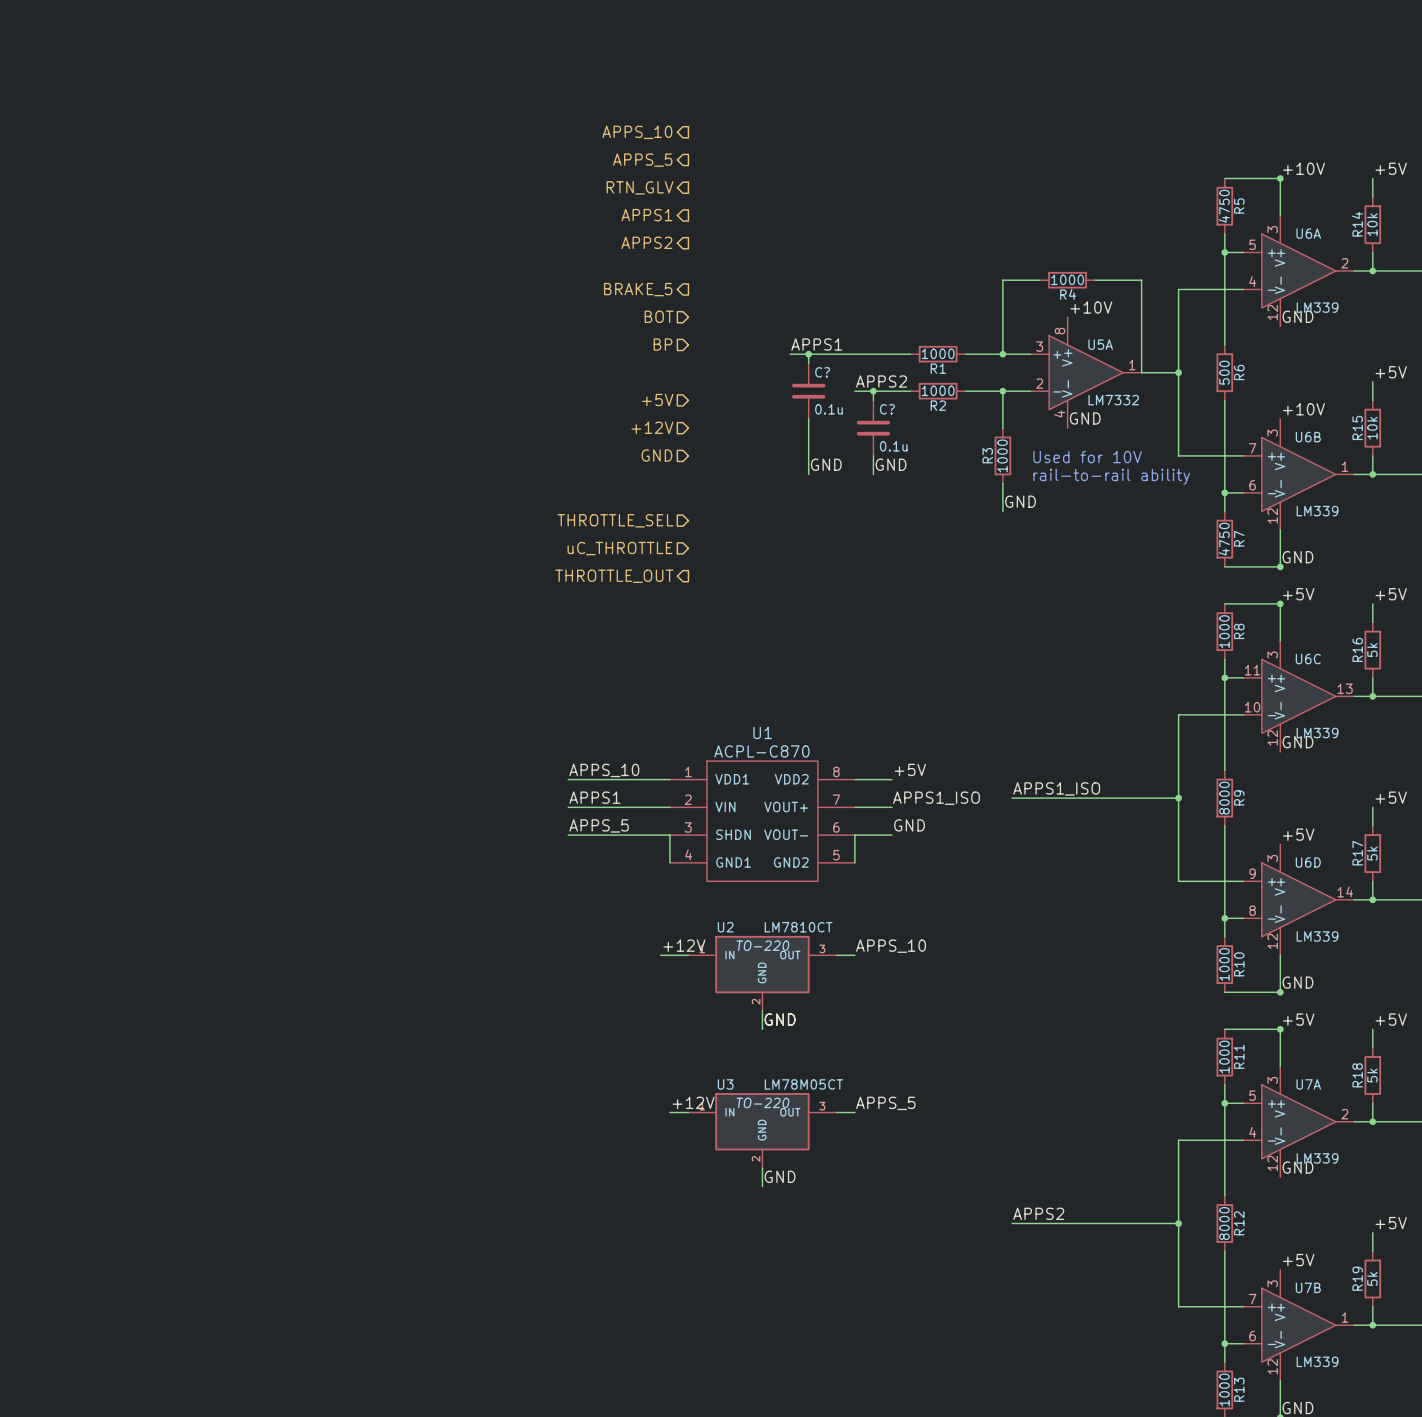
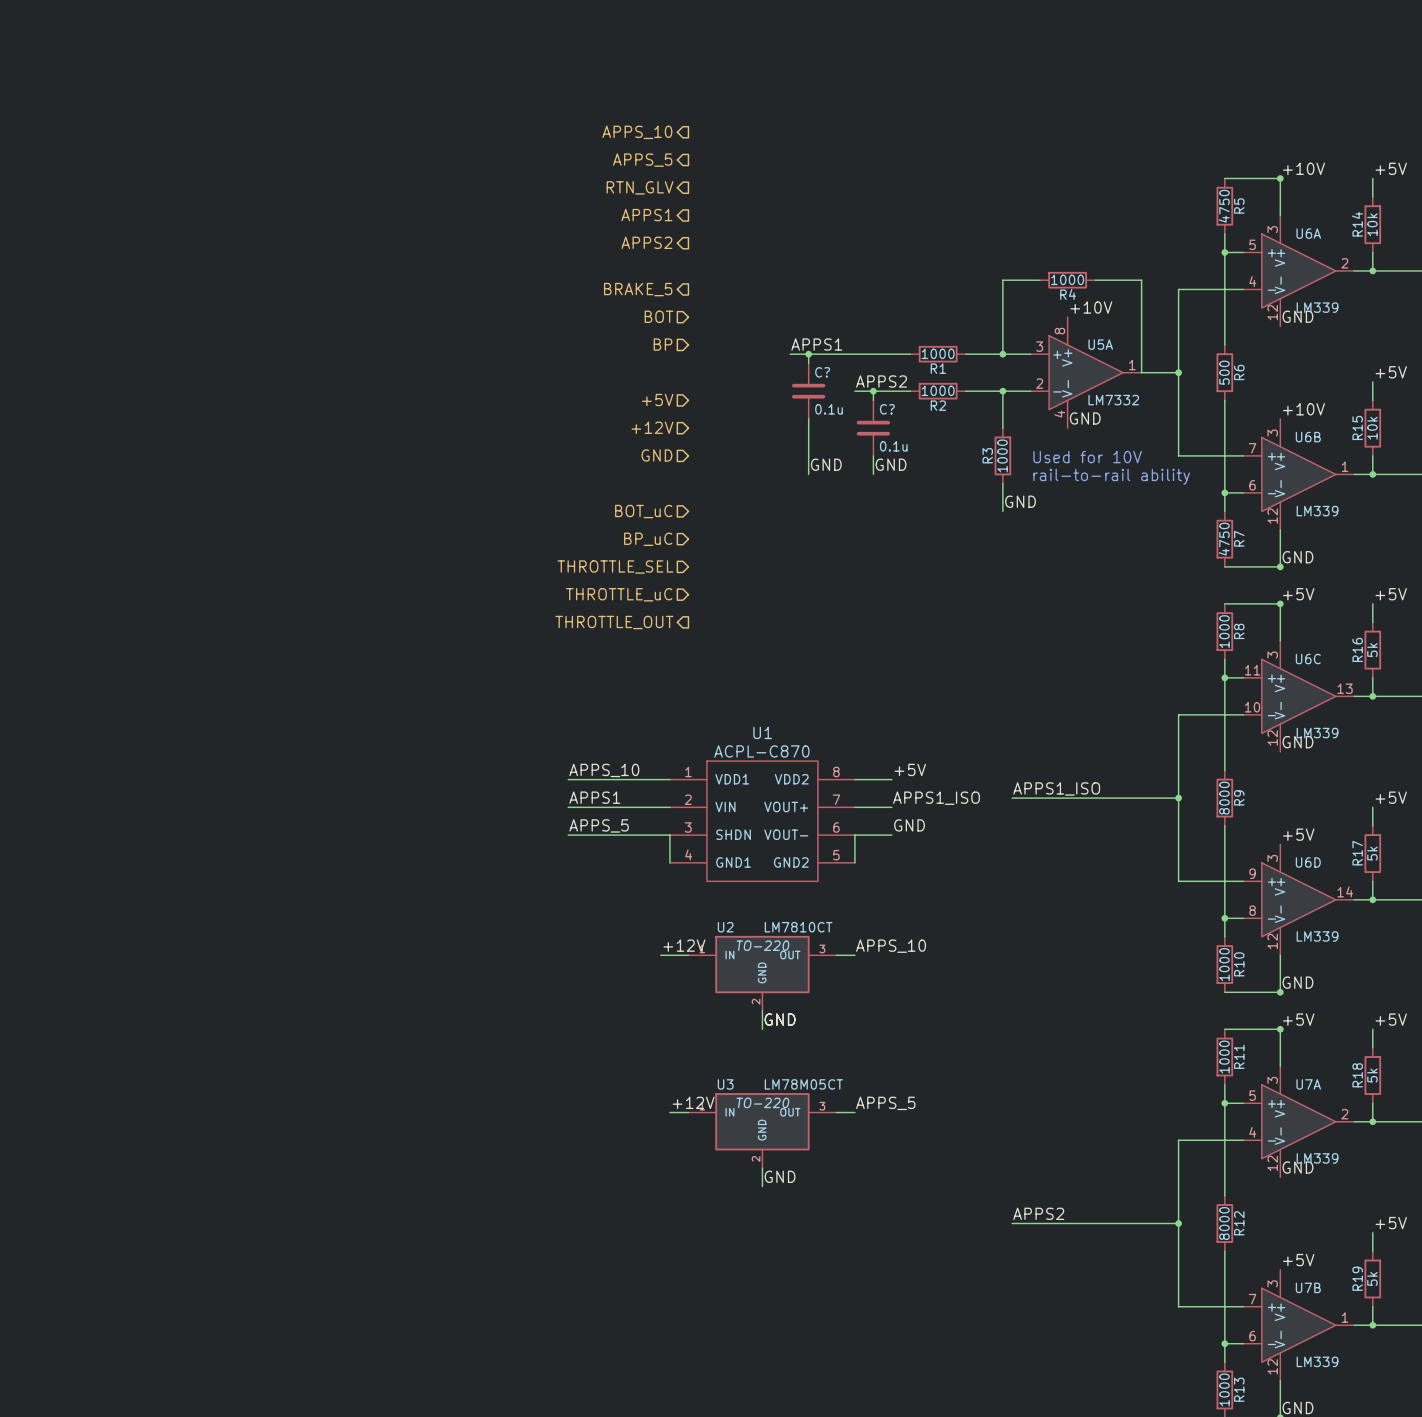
hierarchical label: none -> BOT_uC (643, 511)
hierarchical label position: THROTTLE_SEL (615, 520) -> THROTTLE_SEL (615, 567)
hierarchical label: none -> BP_uC (648, 539)
hierarchical label: uC_THROTTLE (619, 548) -> none
hierarchical label position: THROTTLE_OUT (614, 576) -> THROTTLE_OUT (614, 622)
hierarchical label: none -> THROTTLE_uC (619, 594)

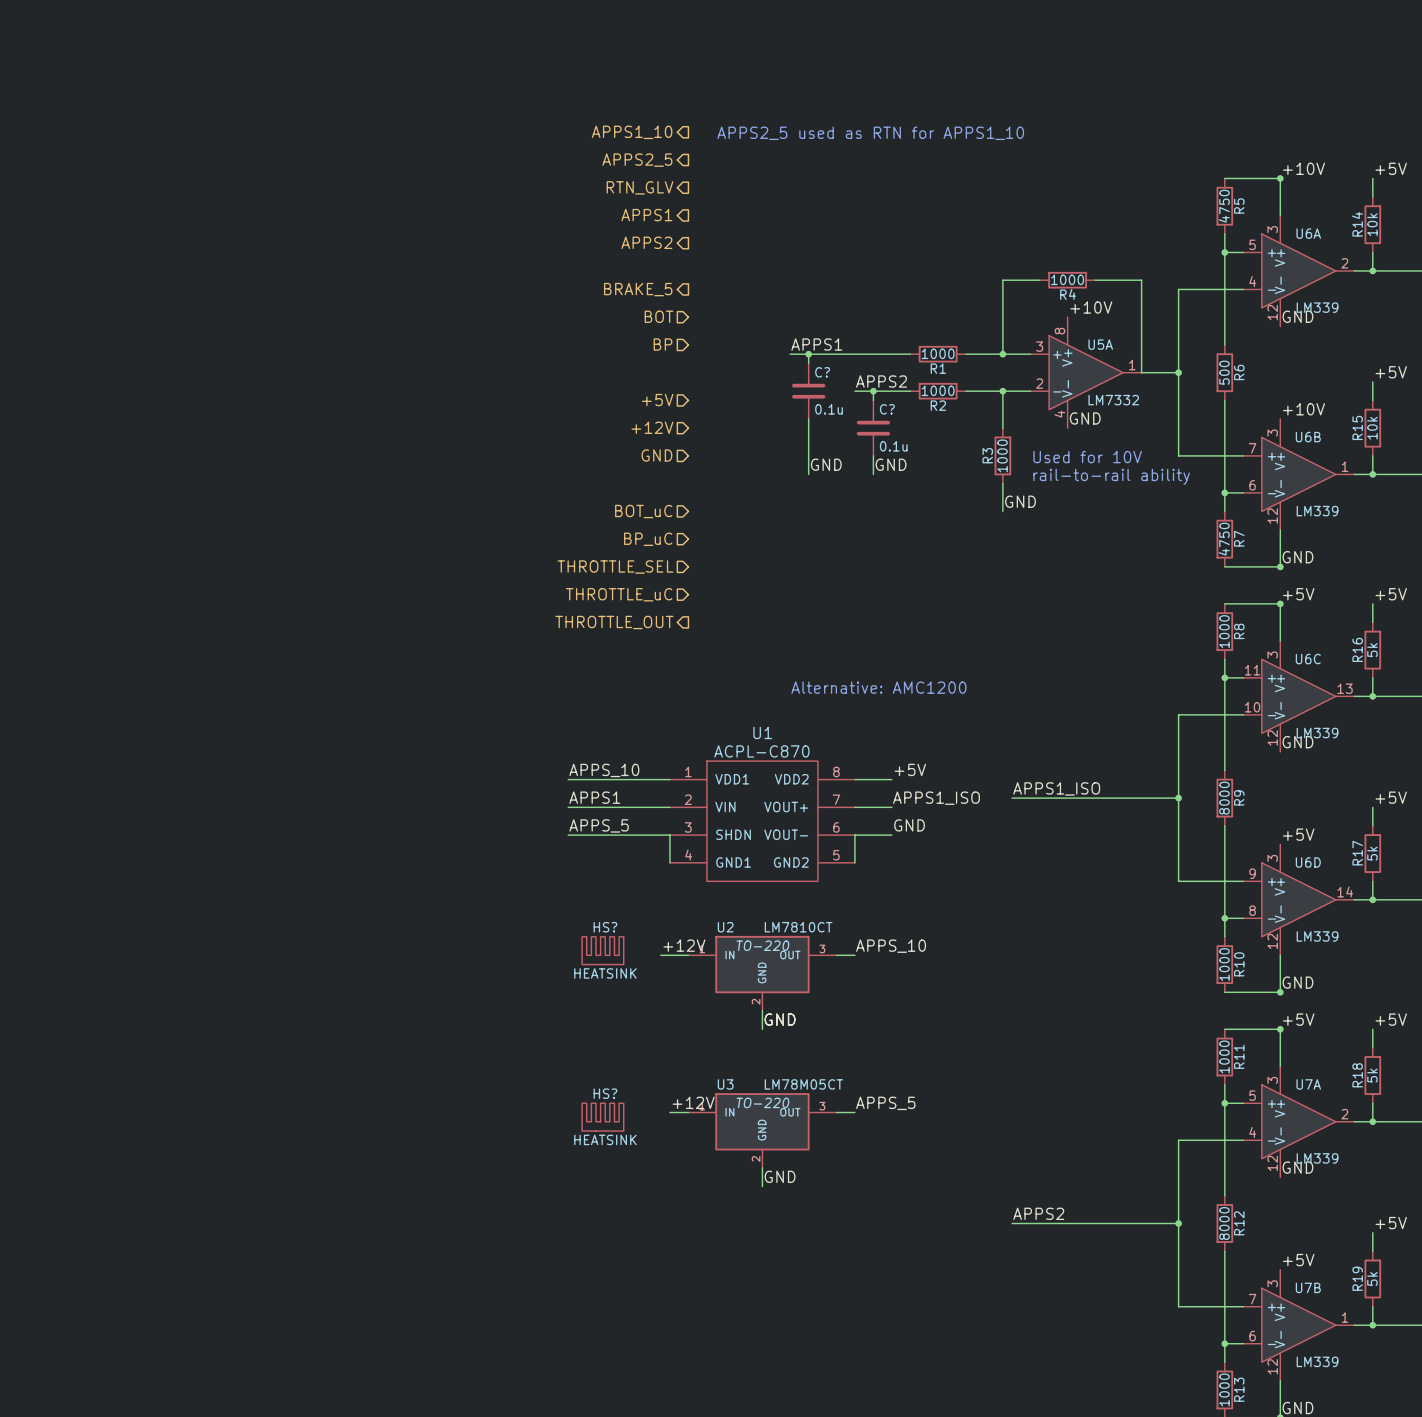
hierarchical label: APPS_10 (637, 132) -> APPS1_10 (632, 132)
text: none -> APPS2_5 used as RTN for APPS1_10 (870, 133)
hierarchical label: APPS_5 (642, 160) -> APPS2_5 (637, 160)
text: none -> Alternative: AMC1200 (878, 687)
HS?: none -> HEATSINK (602, 950)
HS?: none -> HEATSINK (602, 1117)

